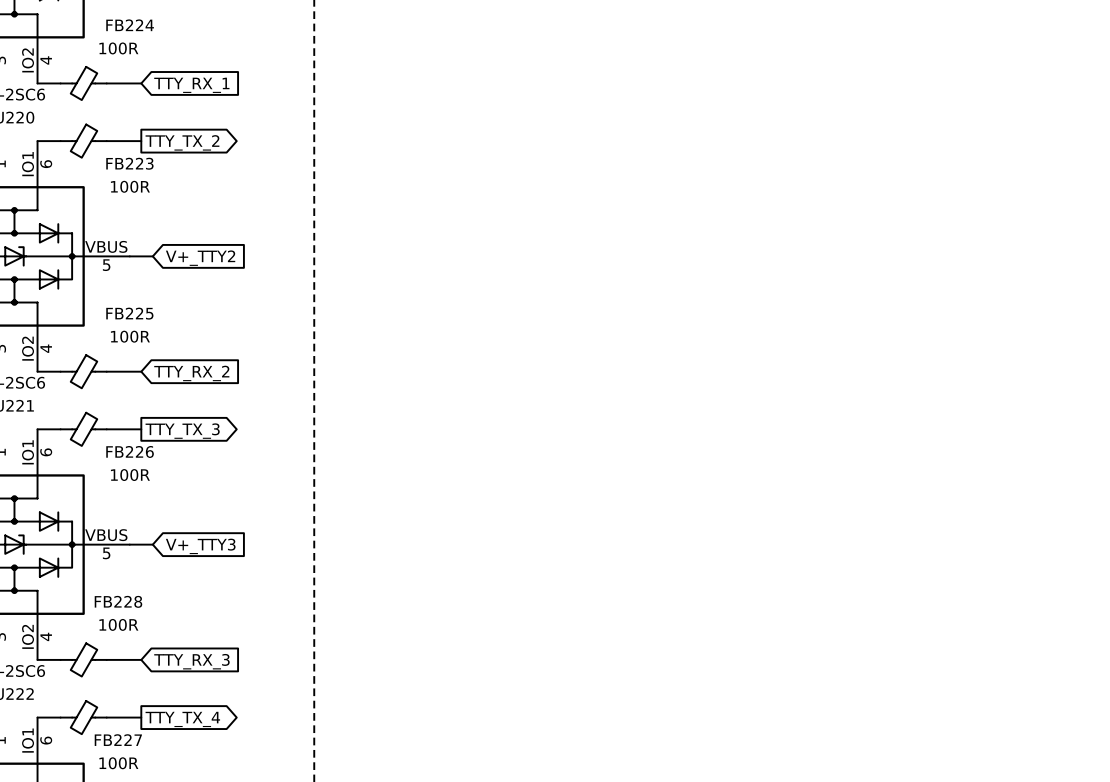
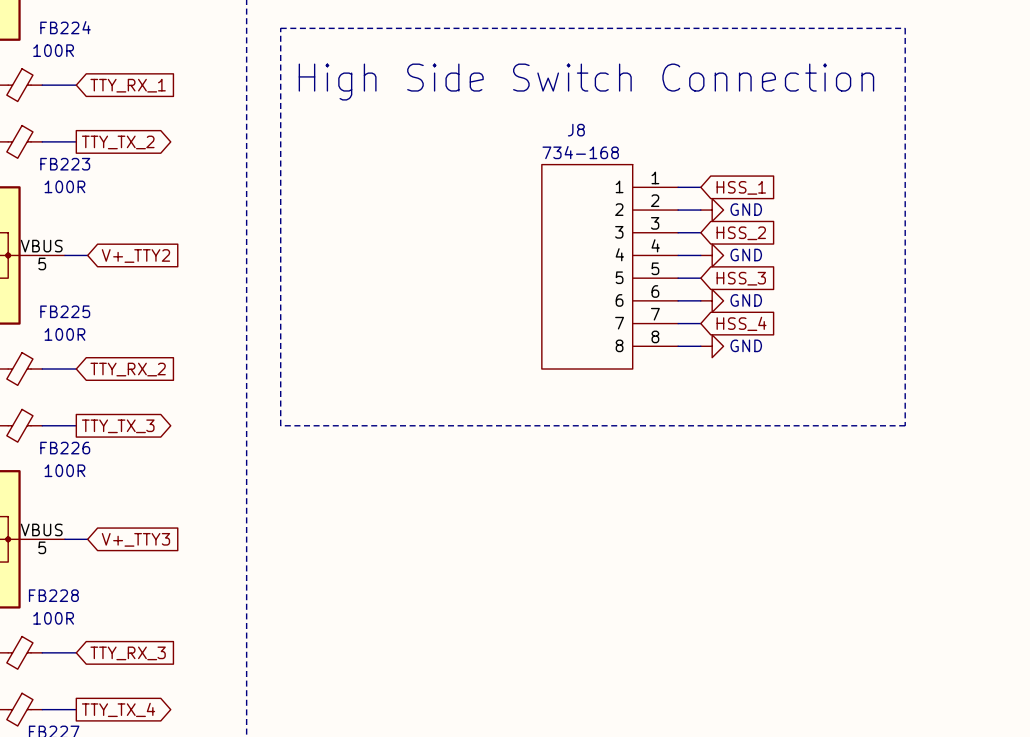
line: none -> (280, 28) (280, 425) (905, 425) (905, 28) (280, 28)
text: none -> High Side Switch Connection (586, 82)
wire: none -> (678, 187) (700, 187)
global label: none -> HSS_1 (741, 187)
wire: none -> (678, 210) (700, 210)
power symbol: none -> GND (712, 210)
wire: none -> (678, 232) (700, 232)
global label: none -> HSS_2 (741, 233)
wire: none -> (678, 255) (700, 255)
power symbol: none -> GND (712, 255)
J8: none -> 734-168 (609, 266)
wire: none -> (678, 278) (700, 278)
global label: none -> HSS_3 (741, 278)
wire: none -> (678, 300) (700, 300)
power symbol: none -> GND (712, 300)
wire: none -> (678, 323) (700, 323)
global label: none -> HSS_4 (741, 323)
wire: none -> (678, 346) (700, 346)
power symbol: none -> GND (712, 346)

